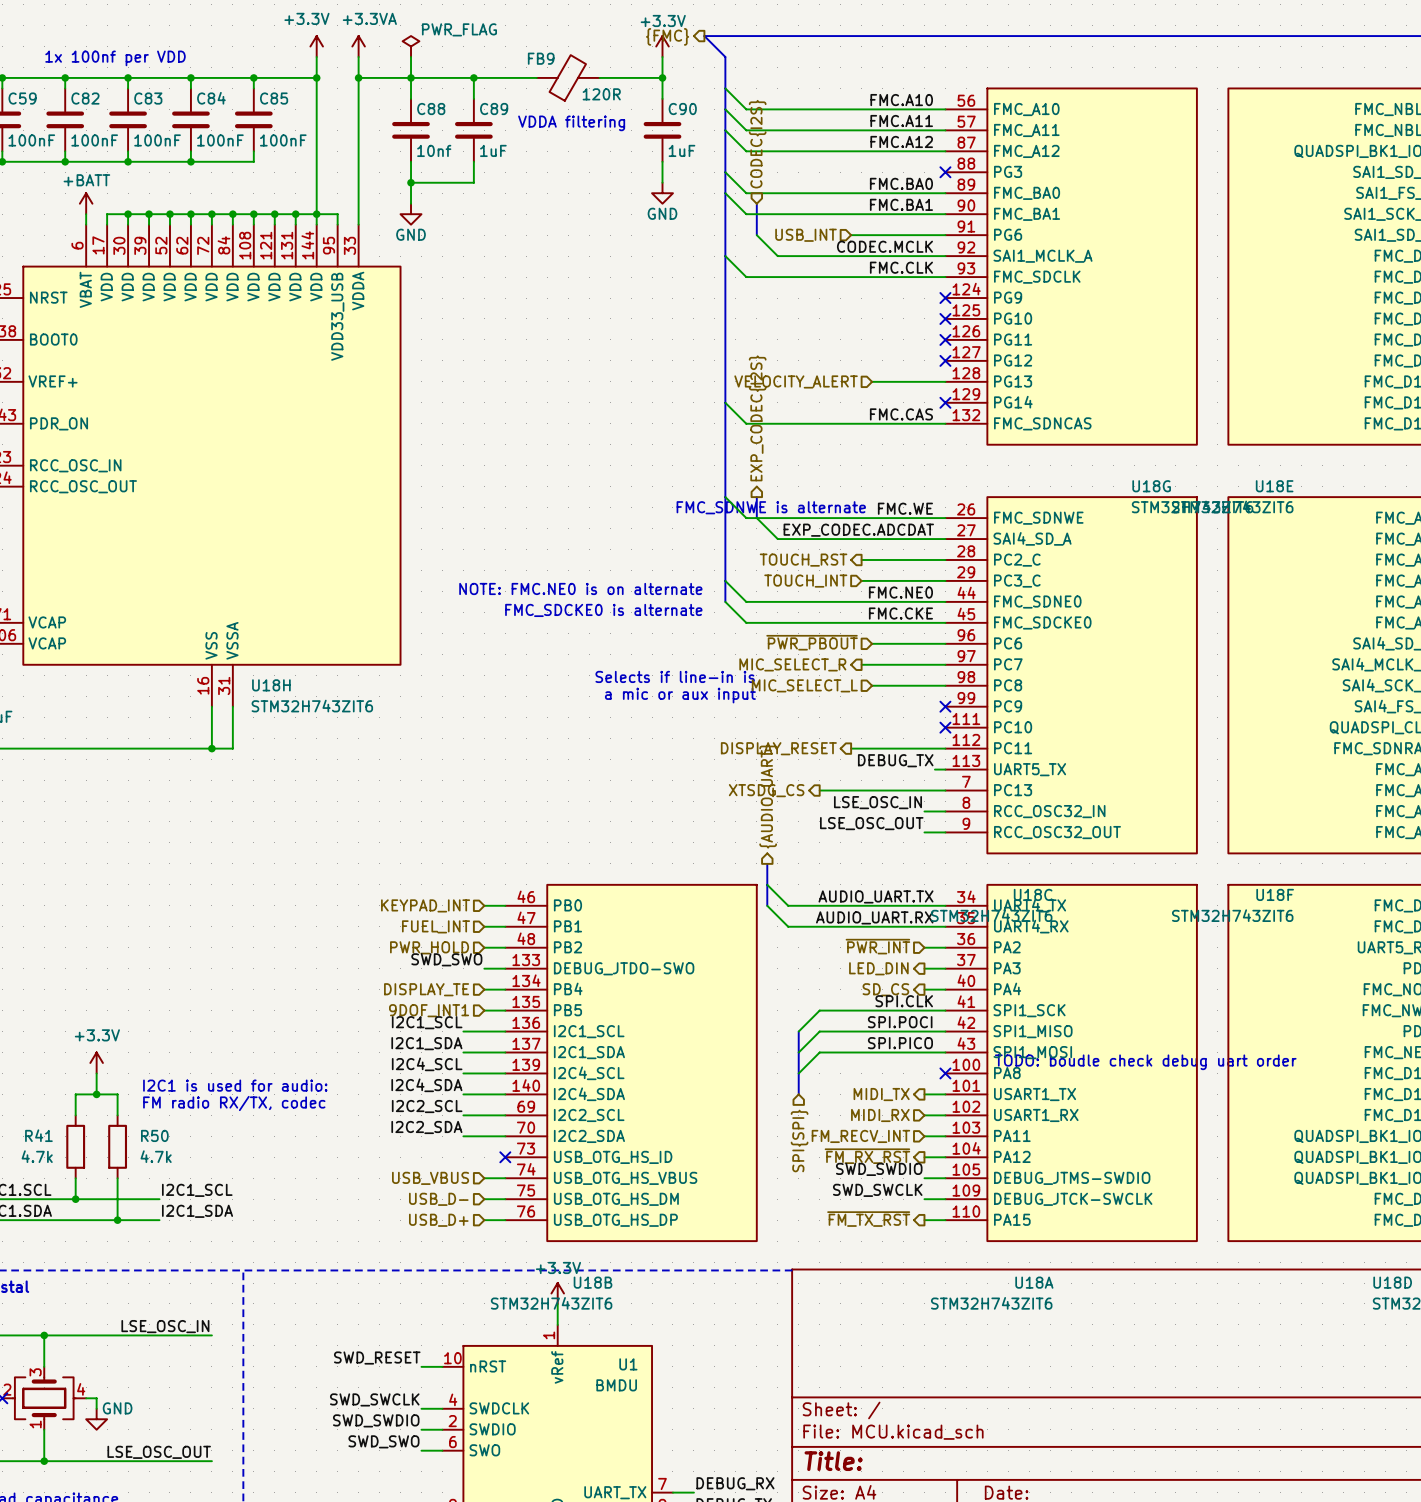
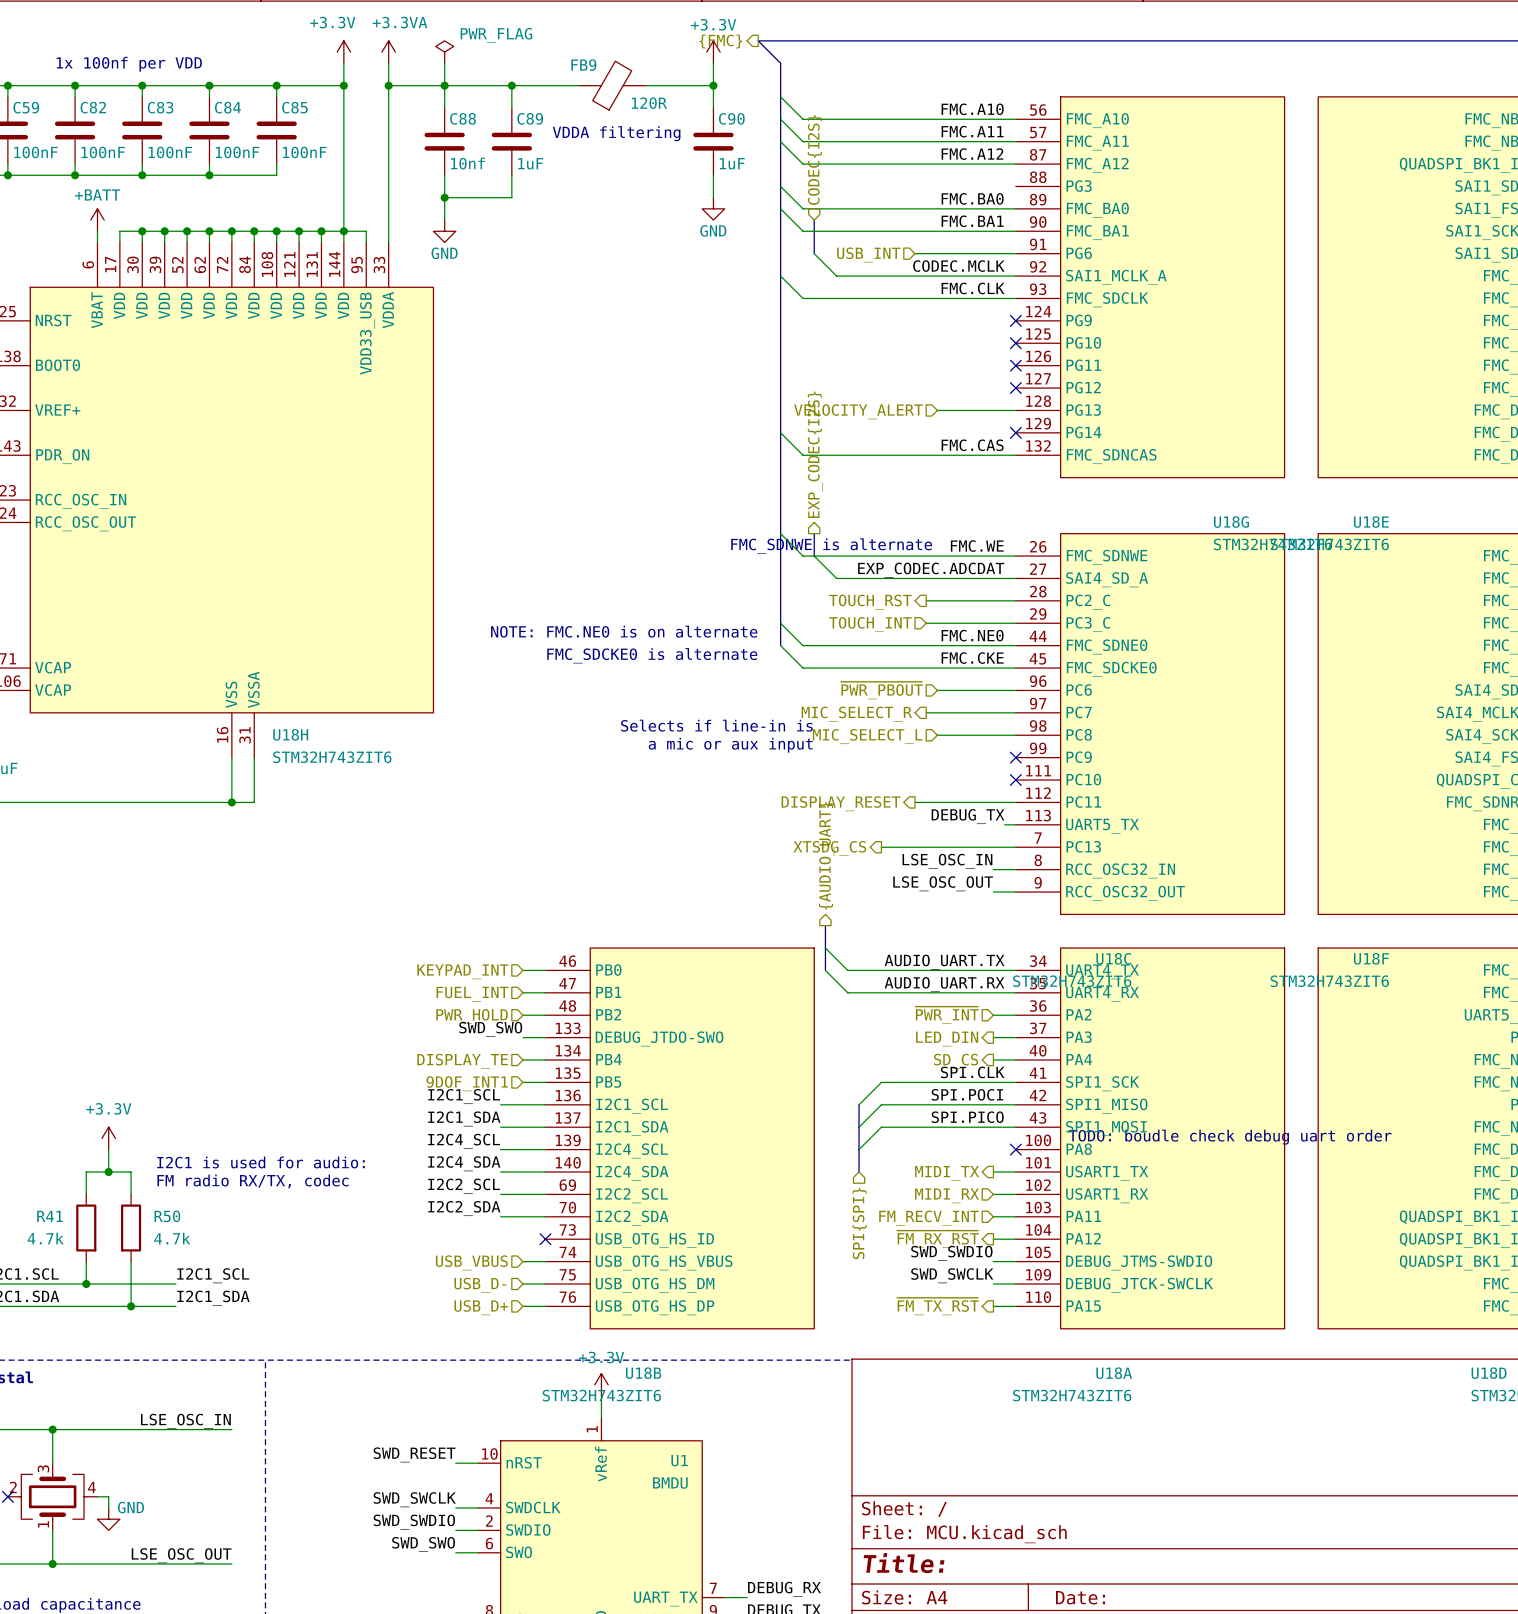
no-connect mark: (945, 172) -> none

